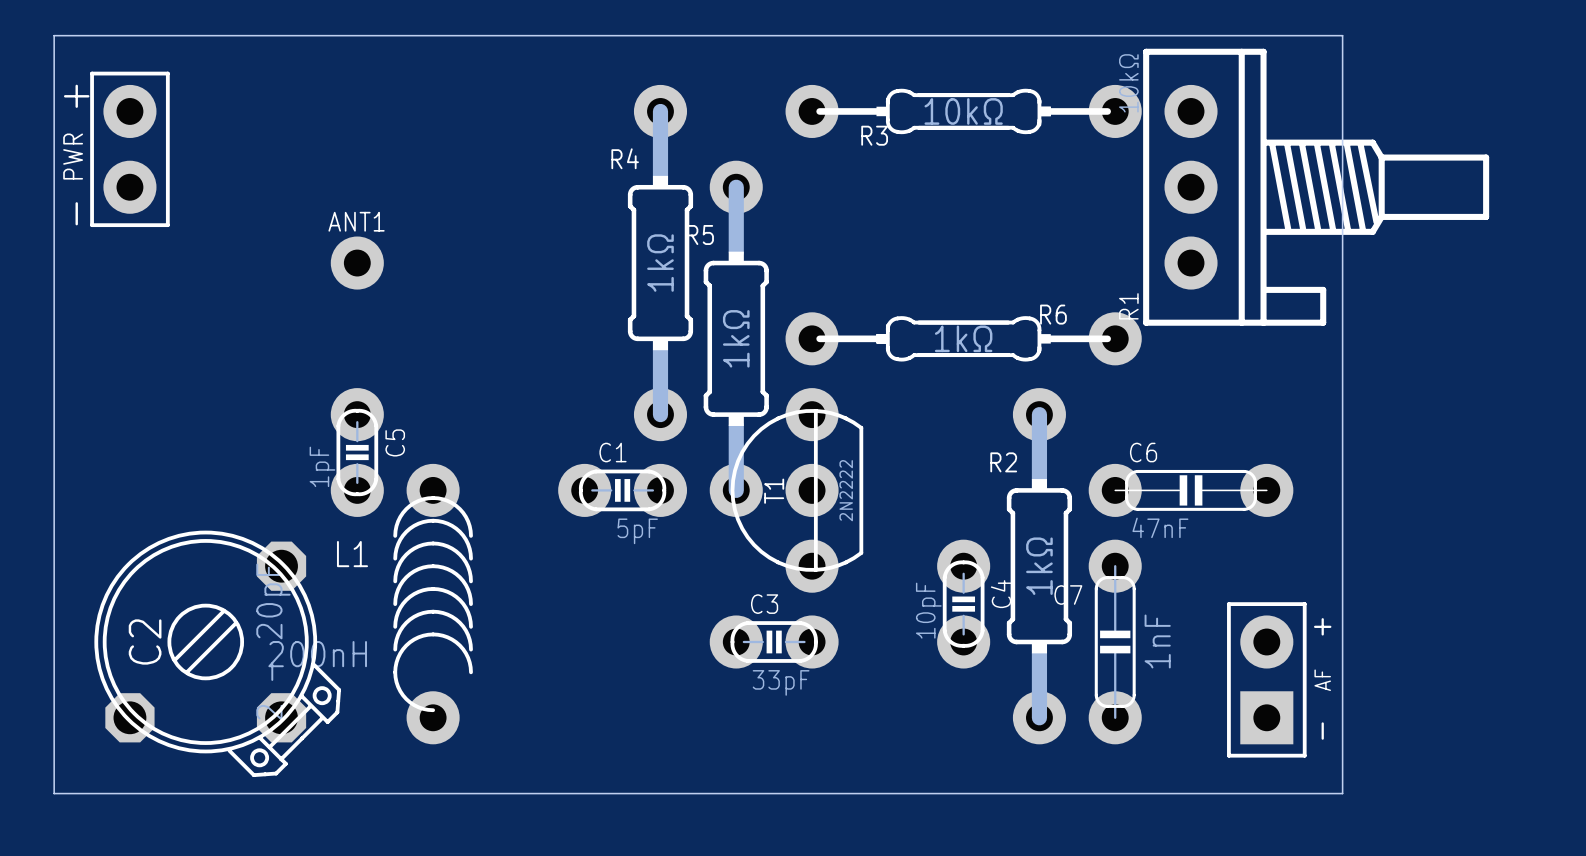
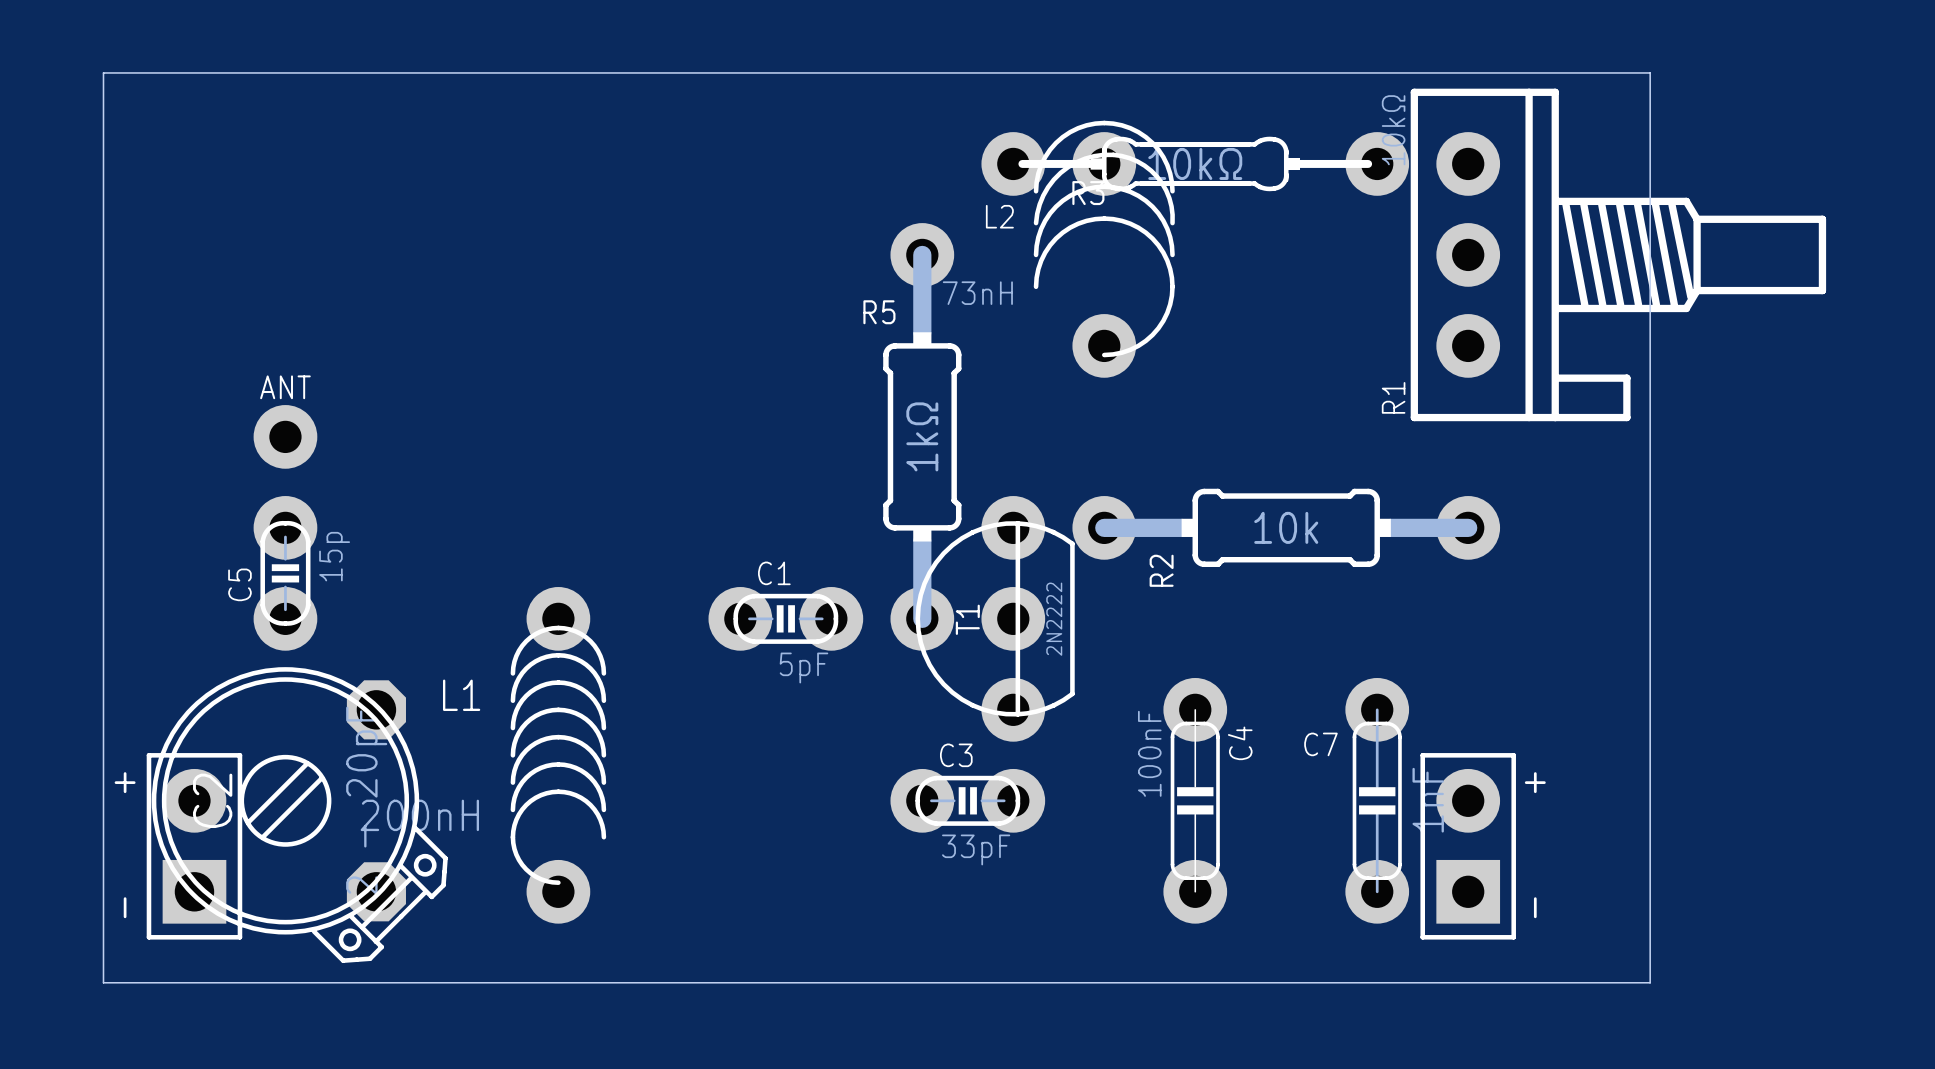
part: (129, 149) -> none
L2: none -> 73nH (1104, 249)
ANT1: (357, 263) -> none
R4: 1kΩ (660, 263) -> none
ANT: none -> (285, 436)
R6: 1kΩ (963, 338) -> none
C5 name position: C5 (395, 442) -> C5 (239, 584)
C5 position: (357, 452) -> (285, 573)
R2 name position: R2 (1003, 462) -> R2 (1161, 570)
C5 value: 1pF (322, 466) -> 15p (334, 556)
C6: 47nF (1191, 490) -> none
C4 footprint: [937, 539, 991, 669] -> [1163, 678, 1228, 924]
R2 rotation: 0° (1039, 566) -> 90° clockwise (1286, 527)
R2 value: 1kΩ (1039, 566) -> 10k (1286, 527)
C4 value: 10pF (928, 610) -> 100nF (1149, 753)
part: none -> (178, 846)
part: none -> (1483, 846)
AF: (1279, 679) -> none

